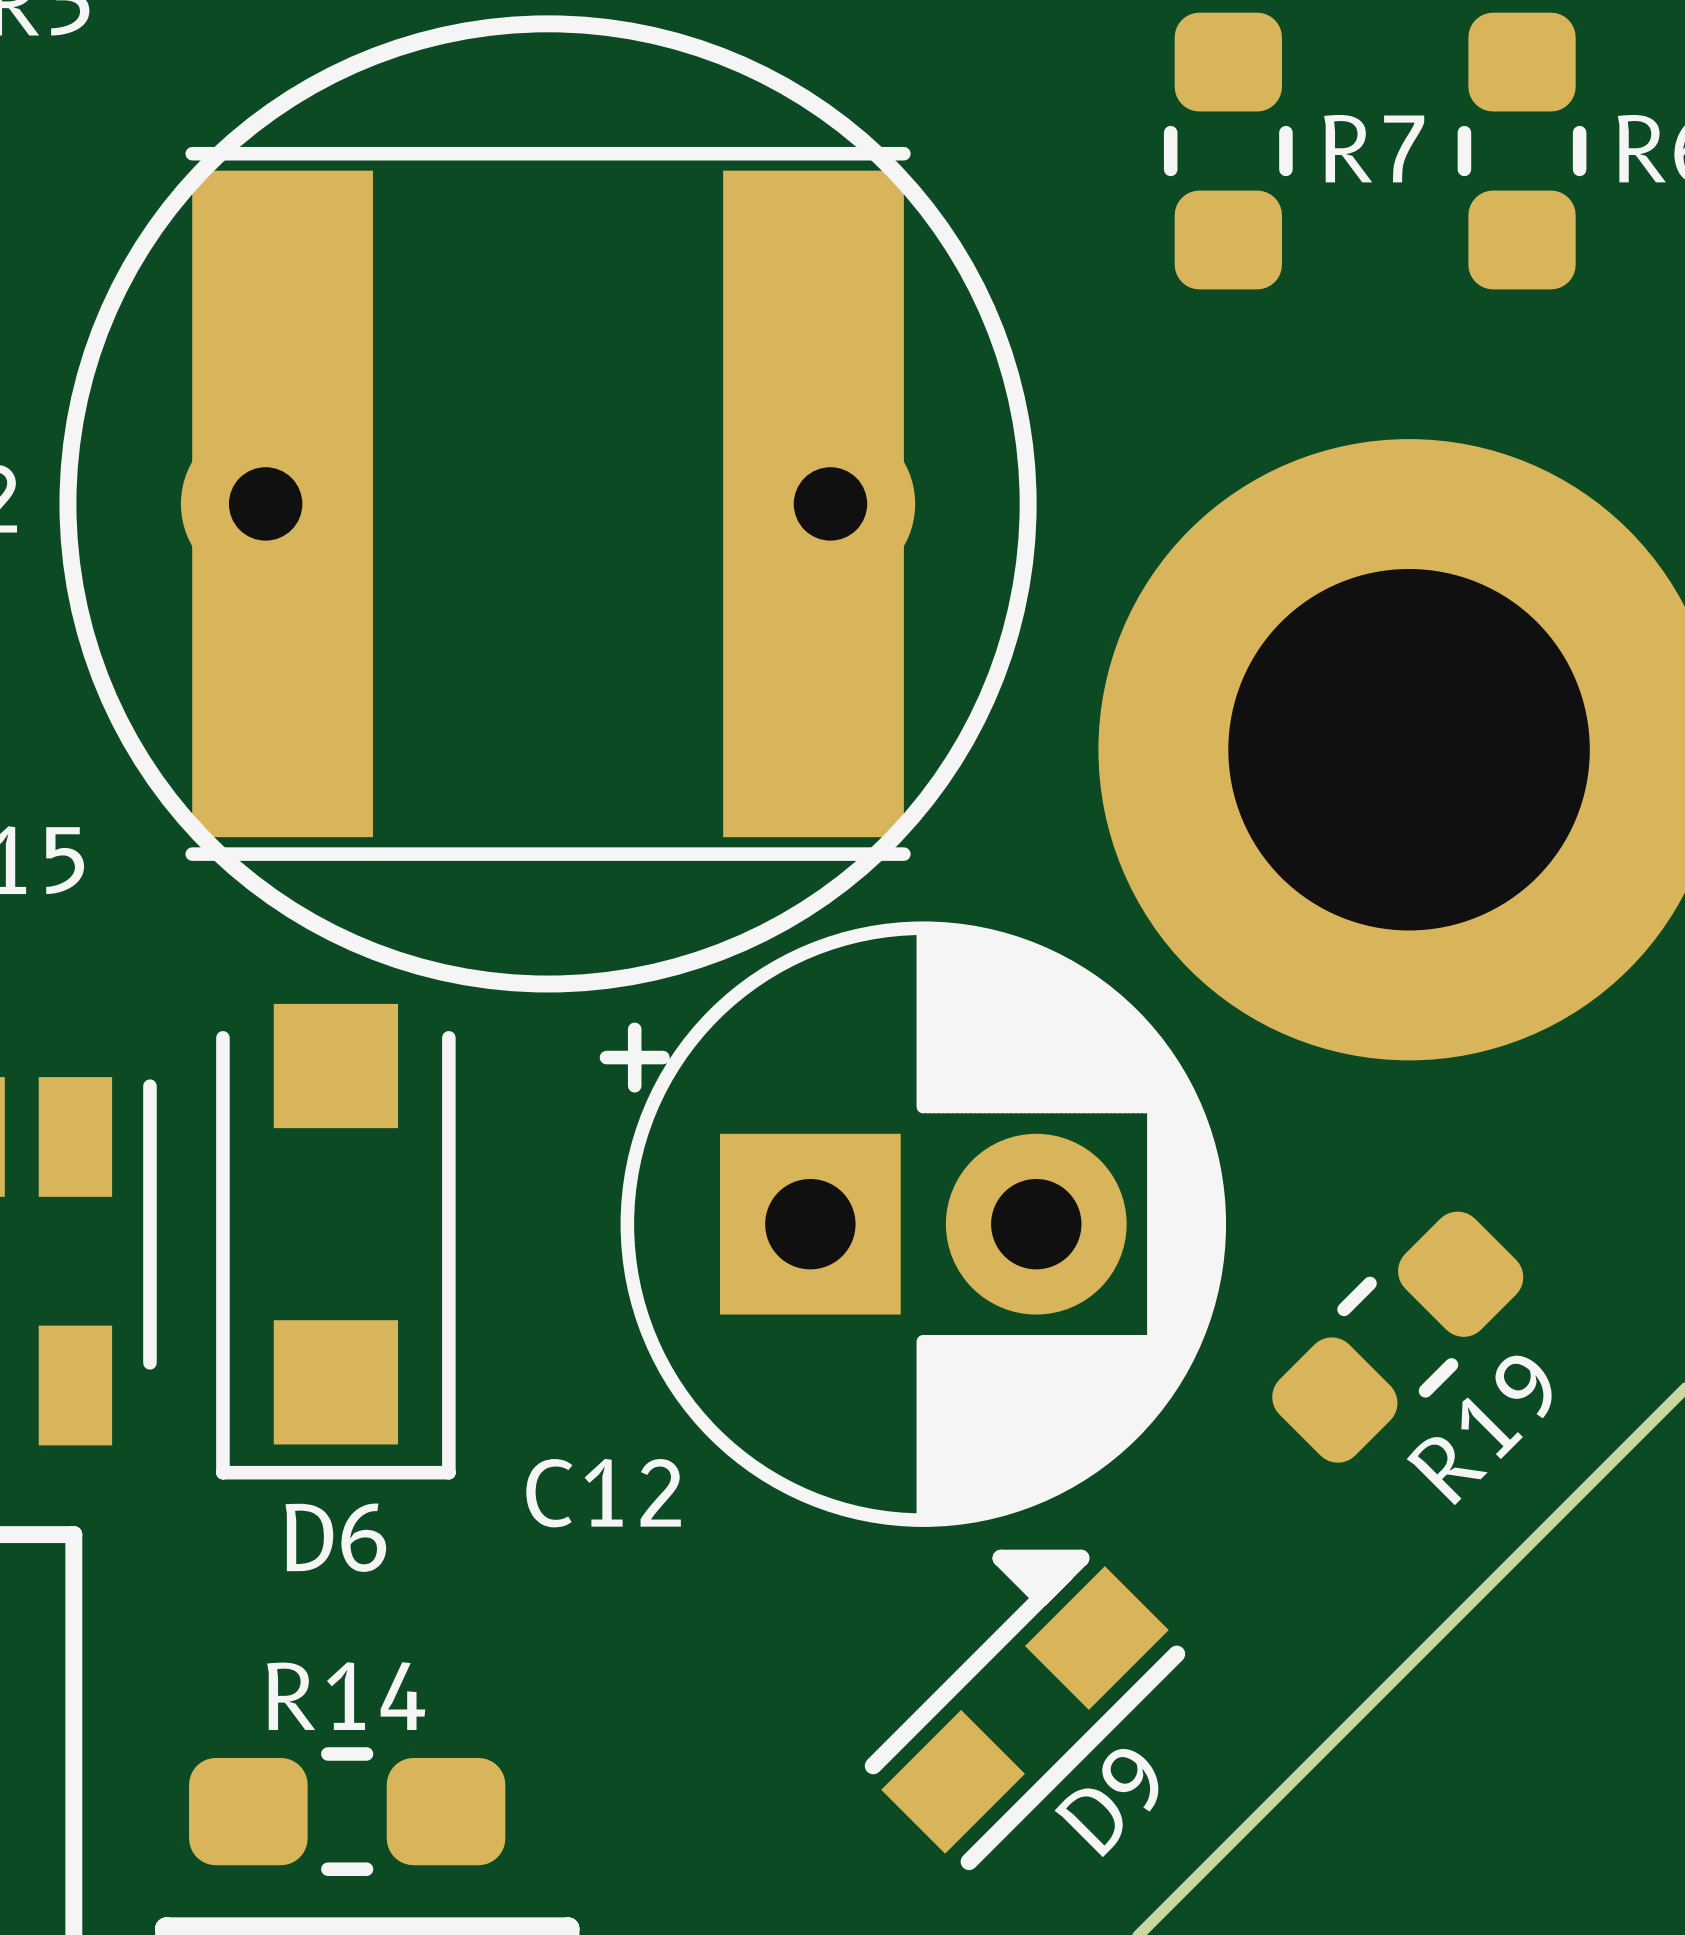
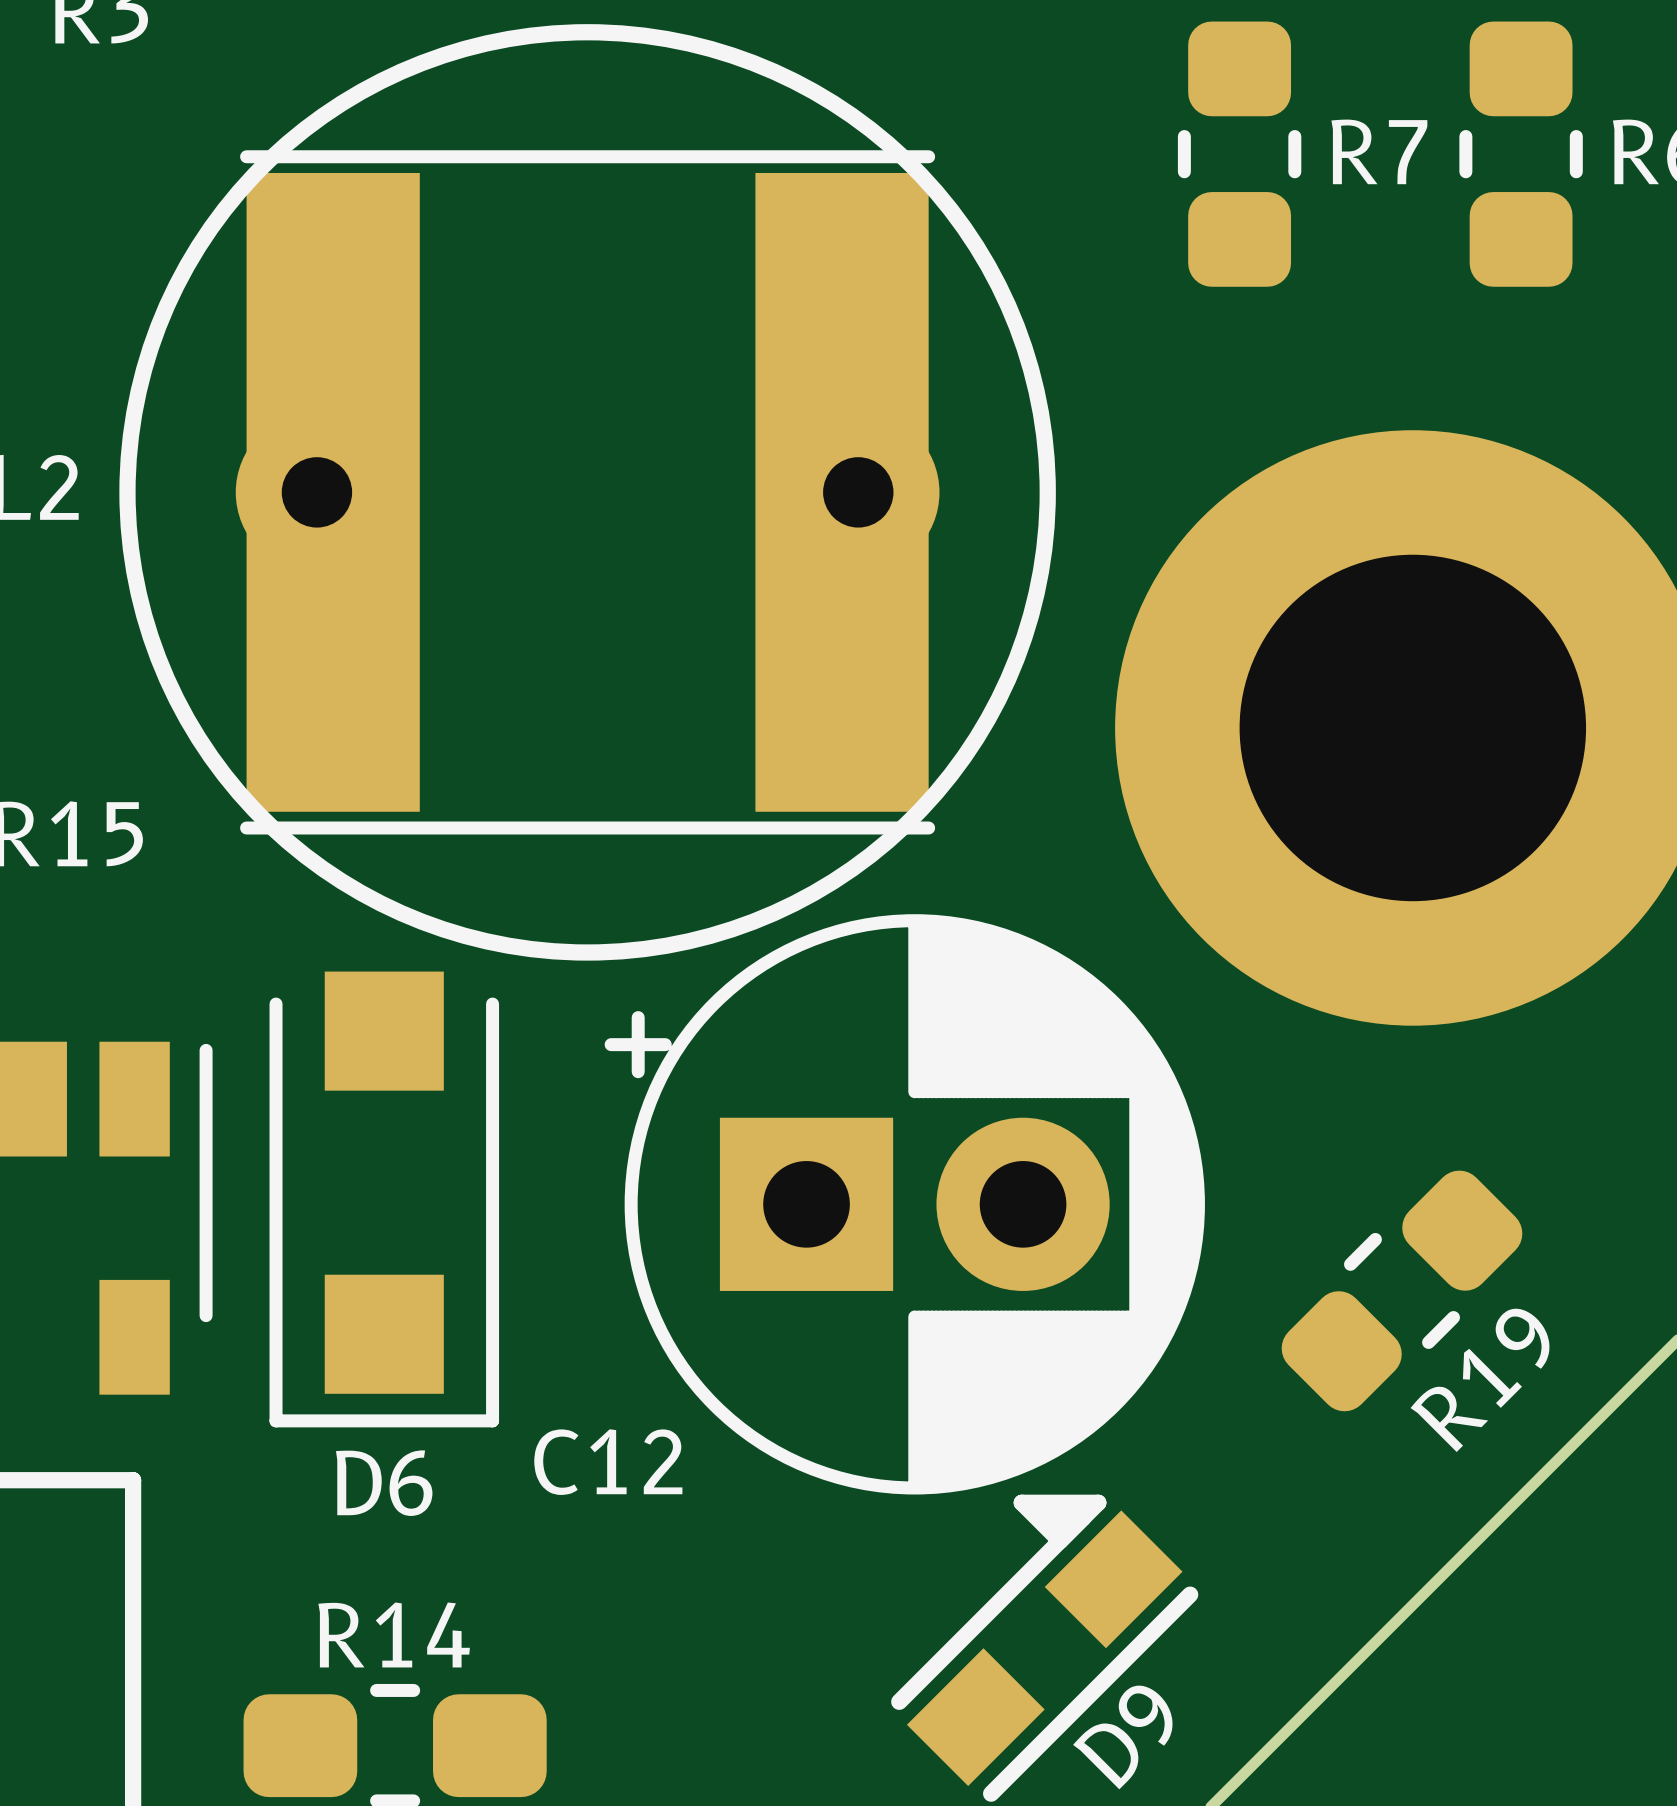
C12 position: (912, 1224) -> (904, 1204)

